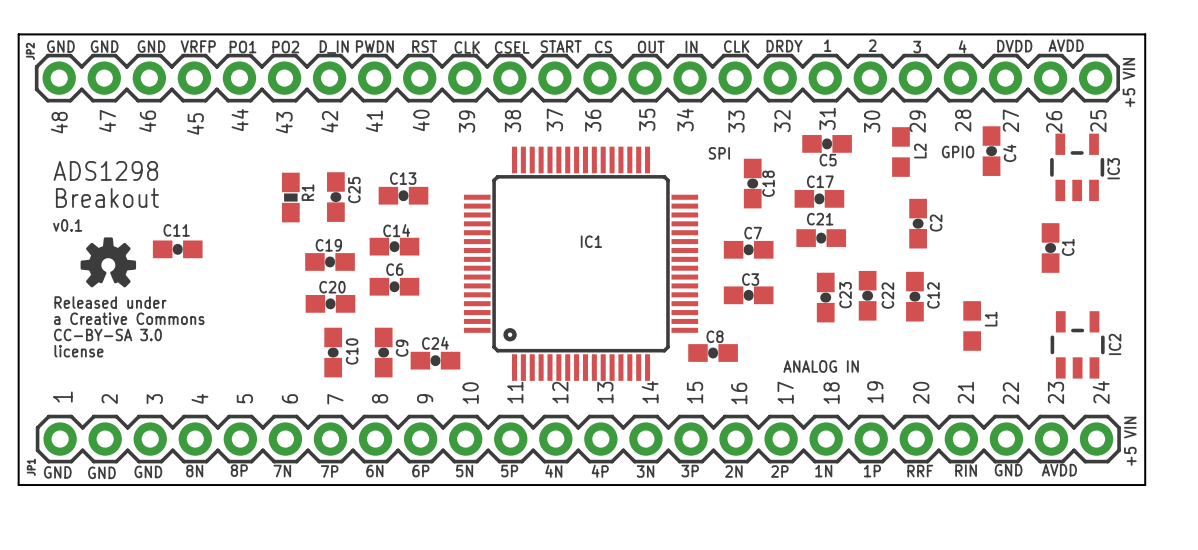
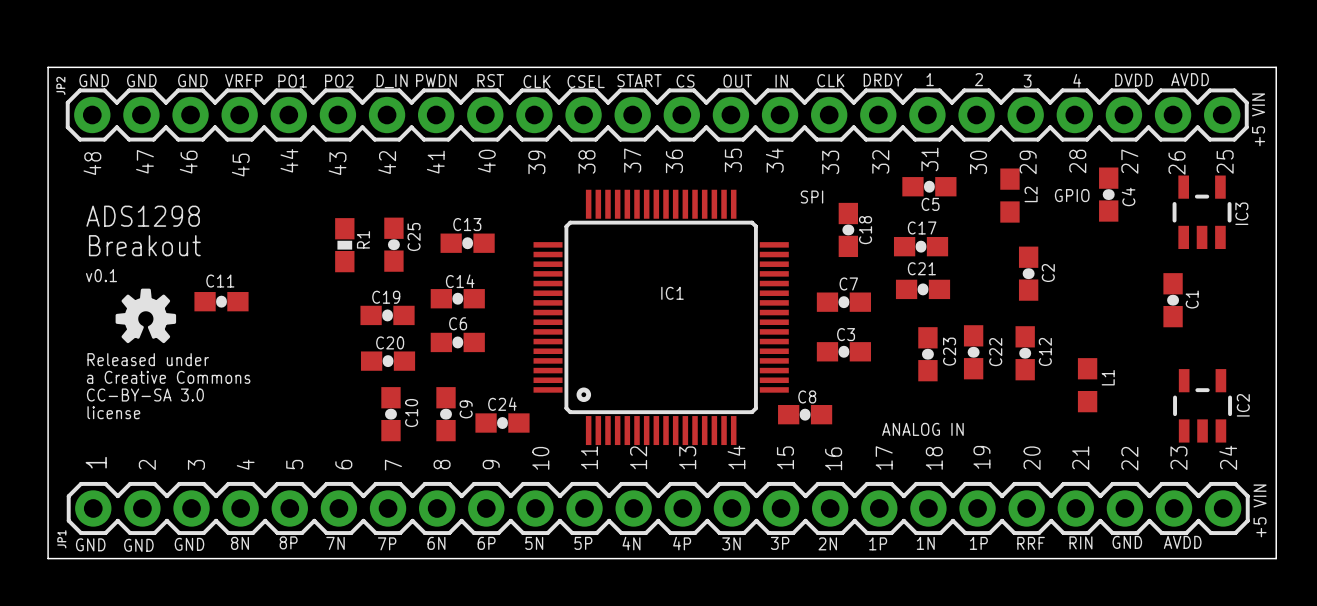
text: 2P (779, 471) -> 1P (878, 543)

